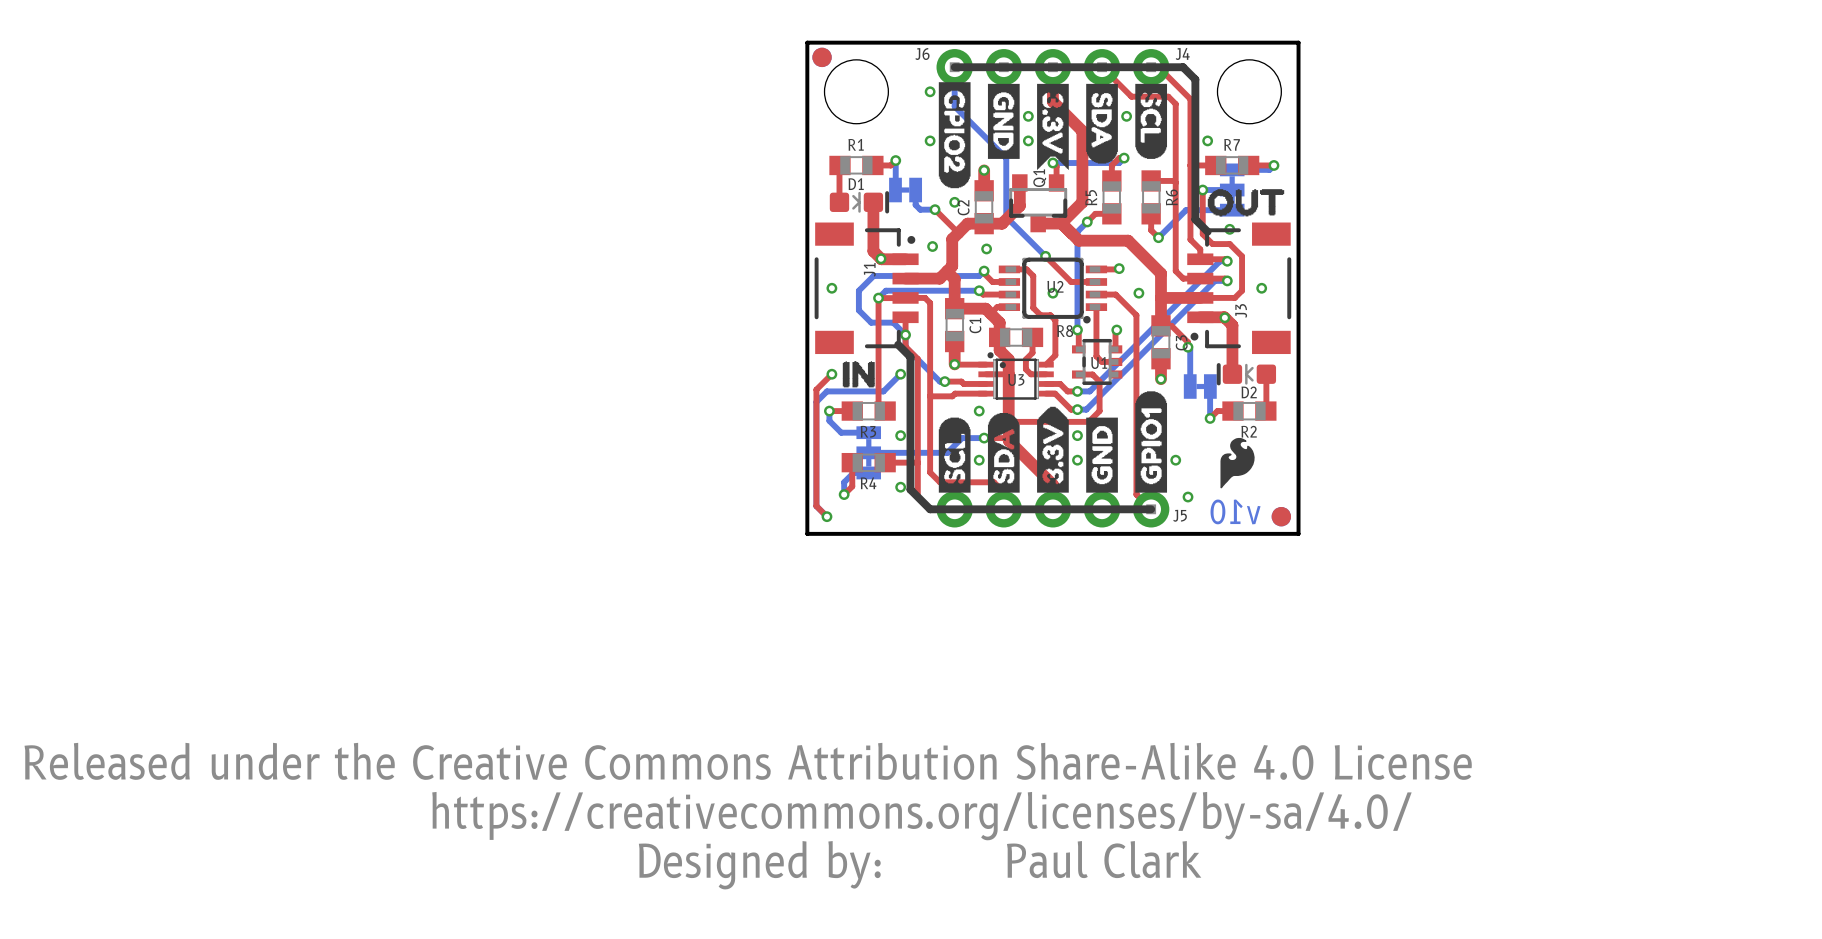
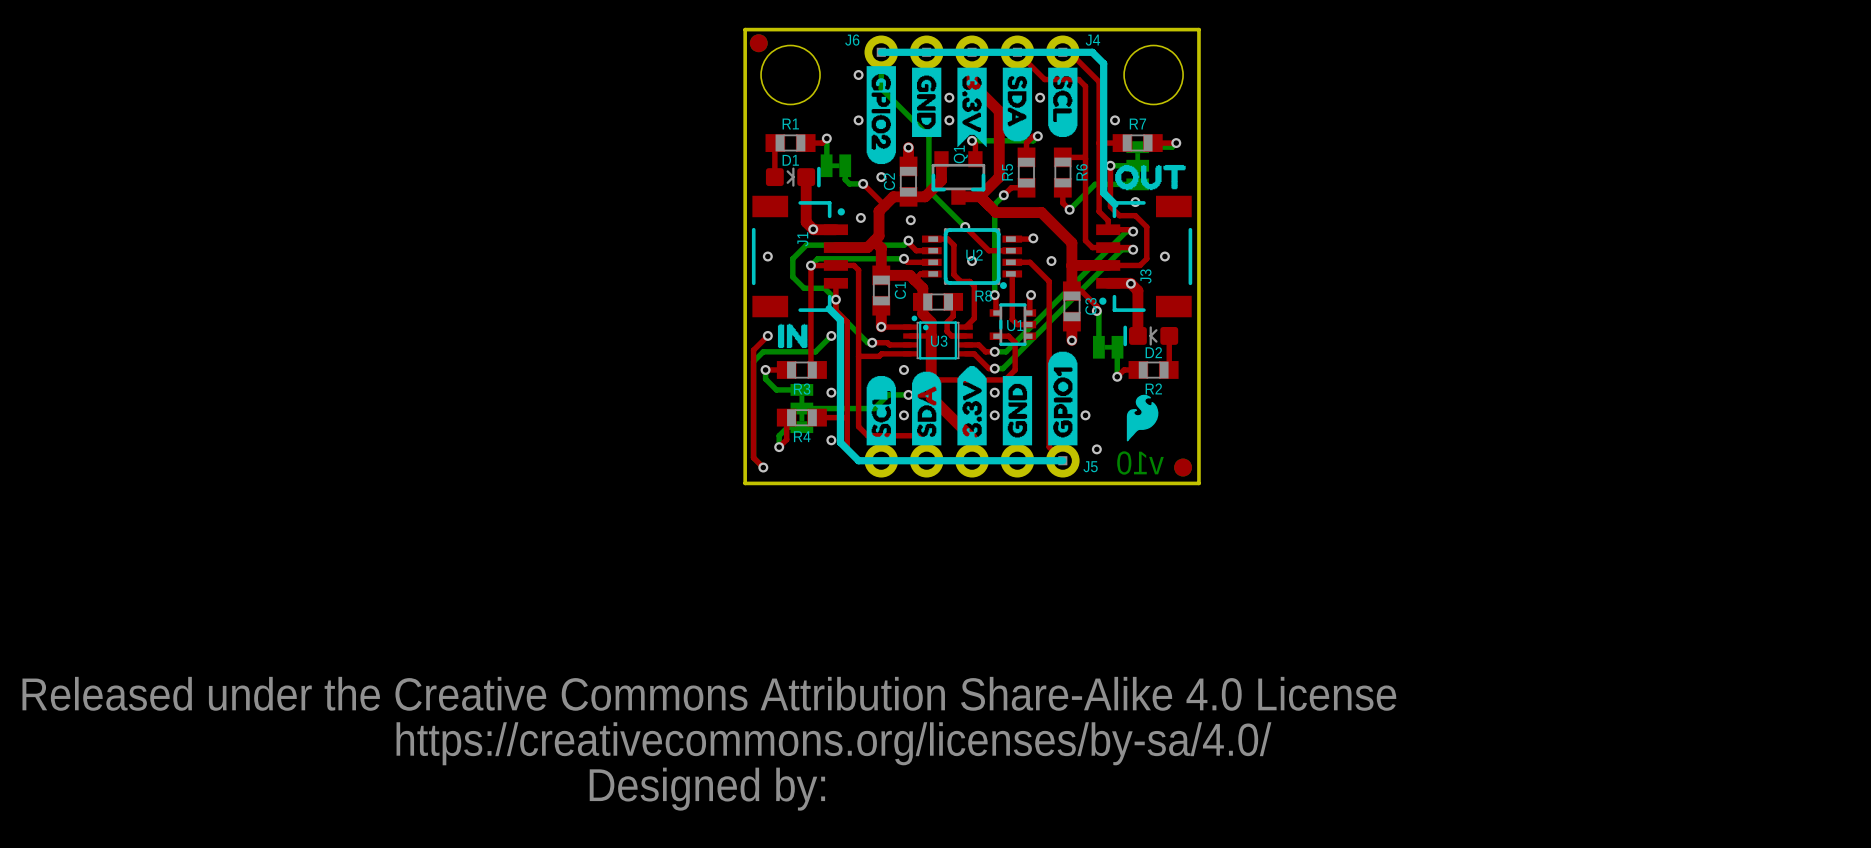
text: Paul Clark (1104, 859) -> none

